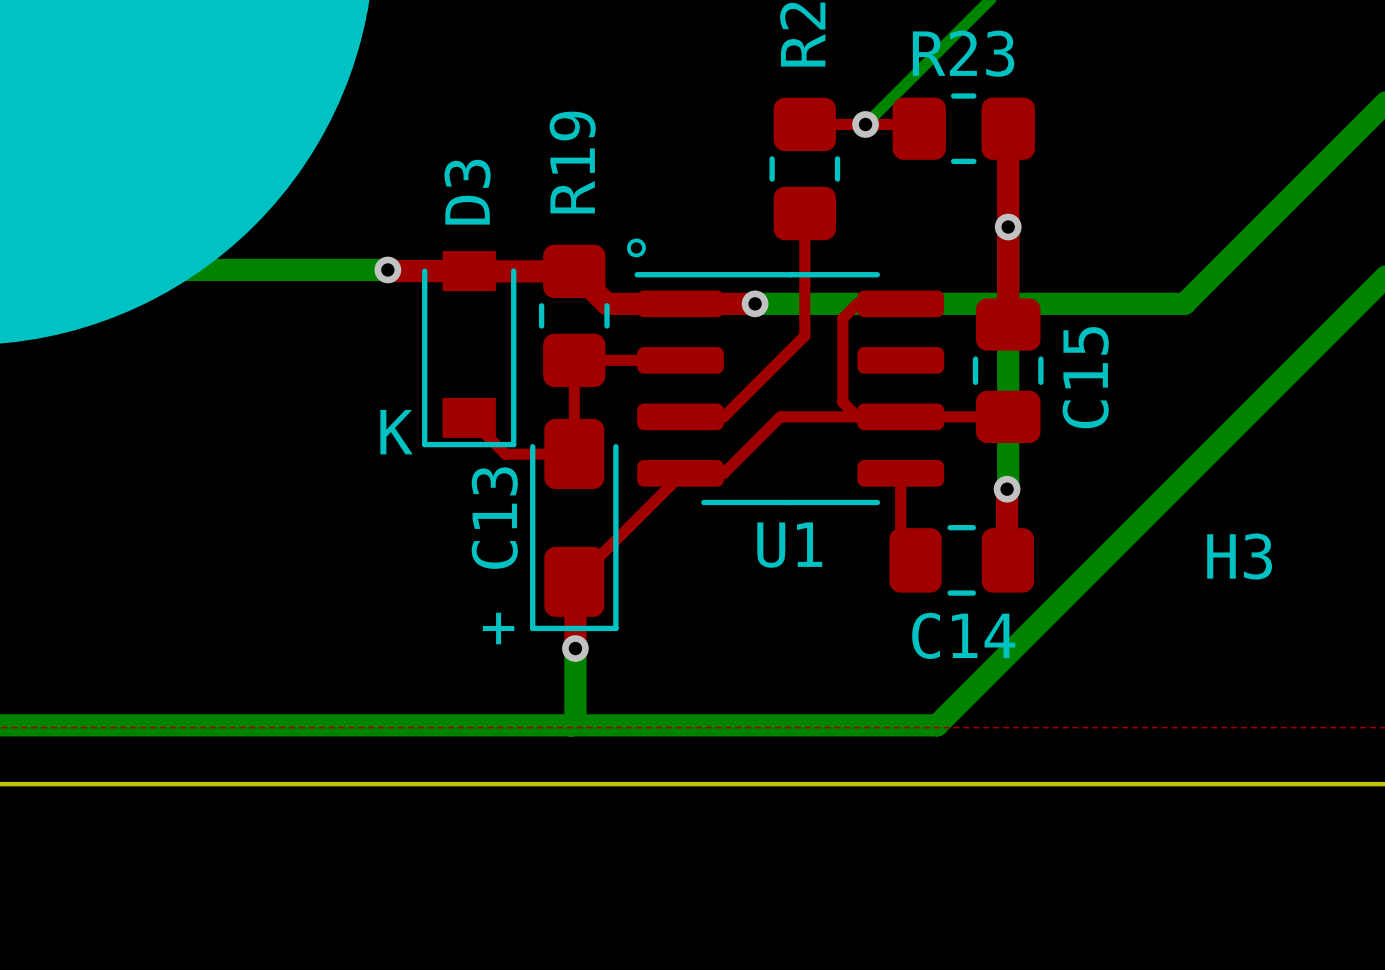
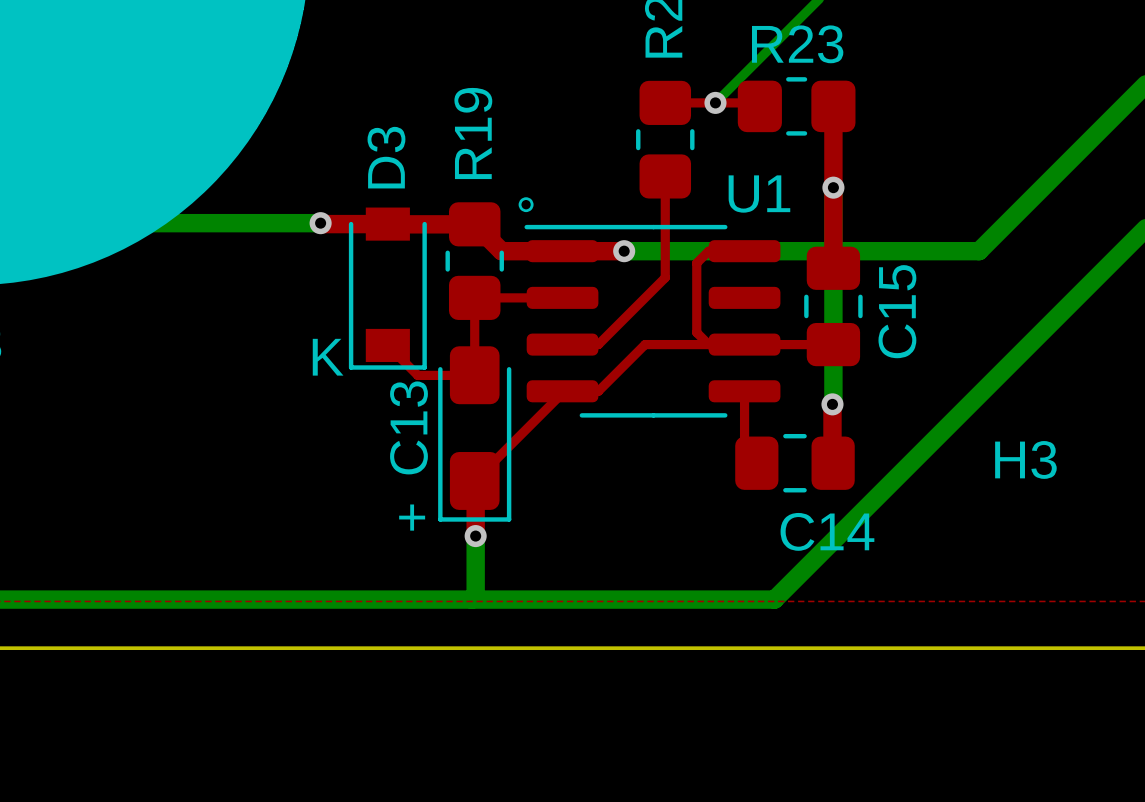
U1 name position: U1 (789, 545) -> U1 (759, 194)
C14 name position: C14 (963, 635) -> C14 (827, 531)

